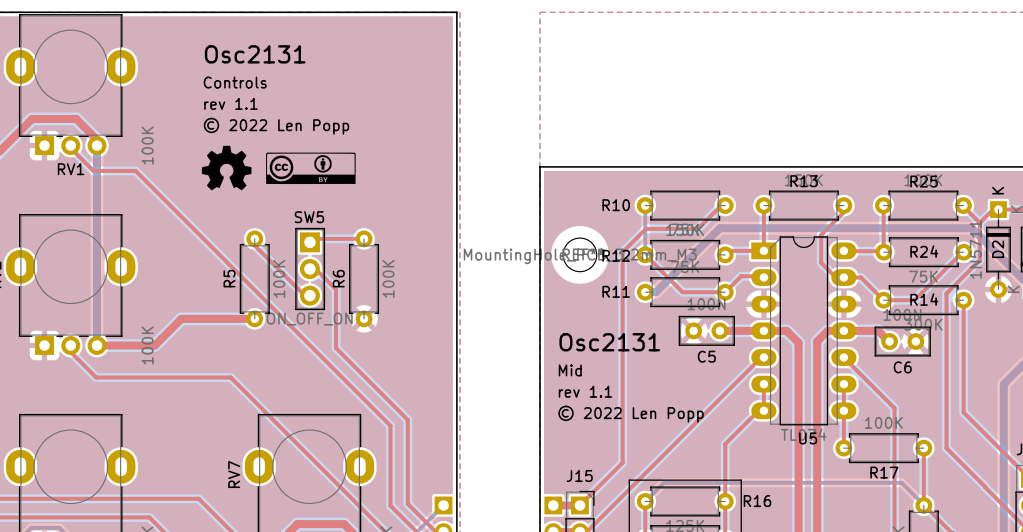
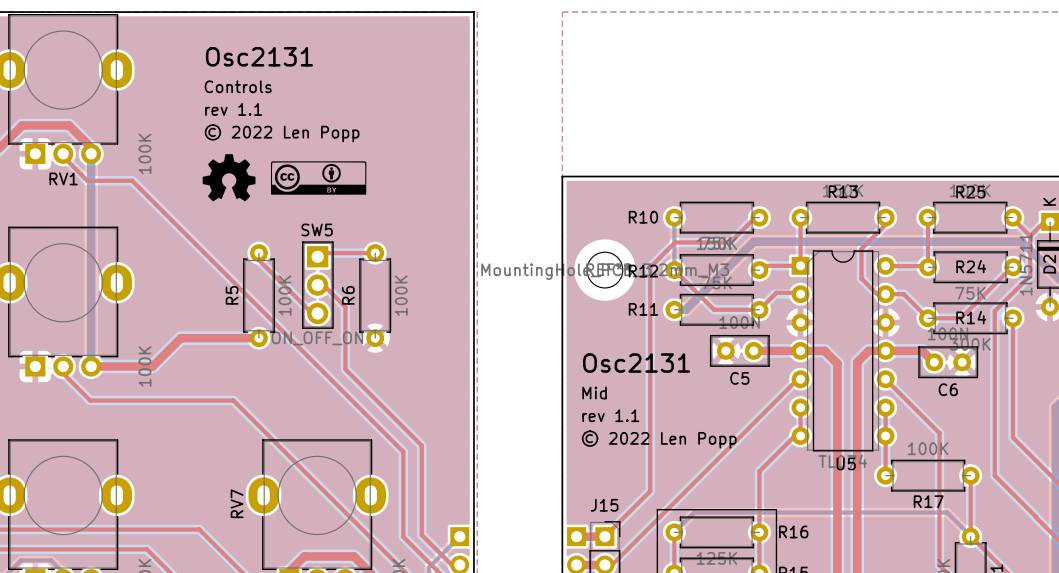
U5 footprint: [751, 236, 857, 426] -> [791, 250, 895, 452]

